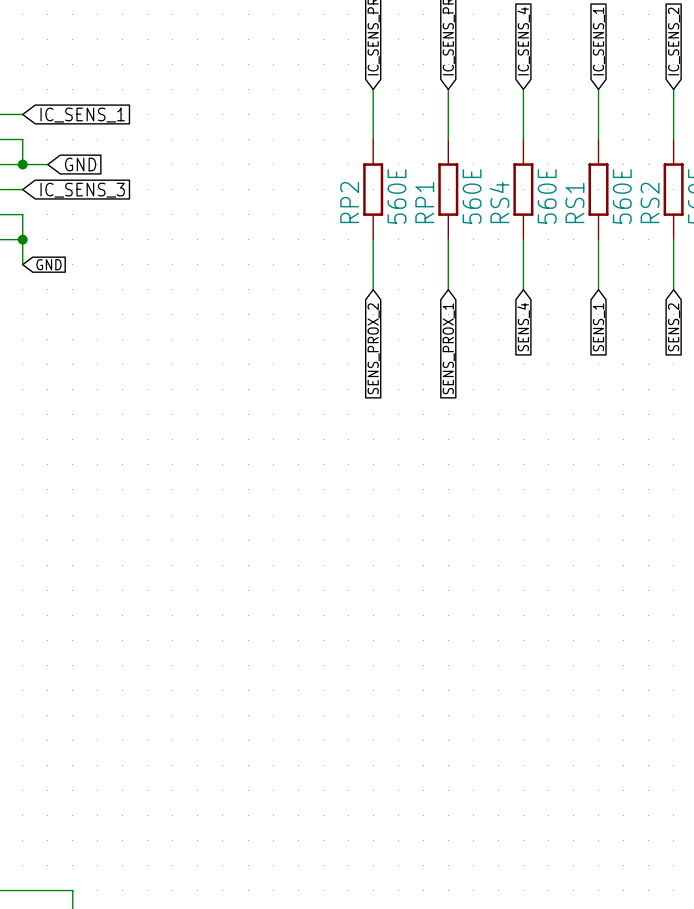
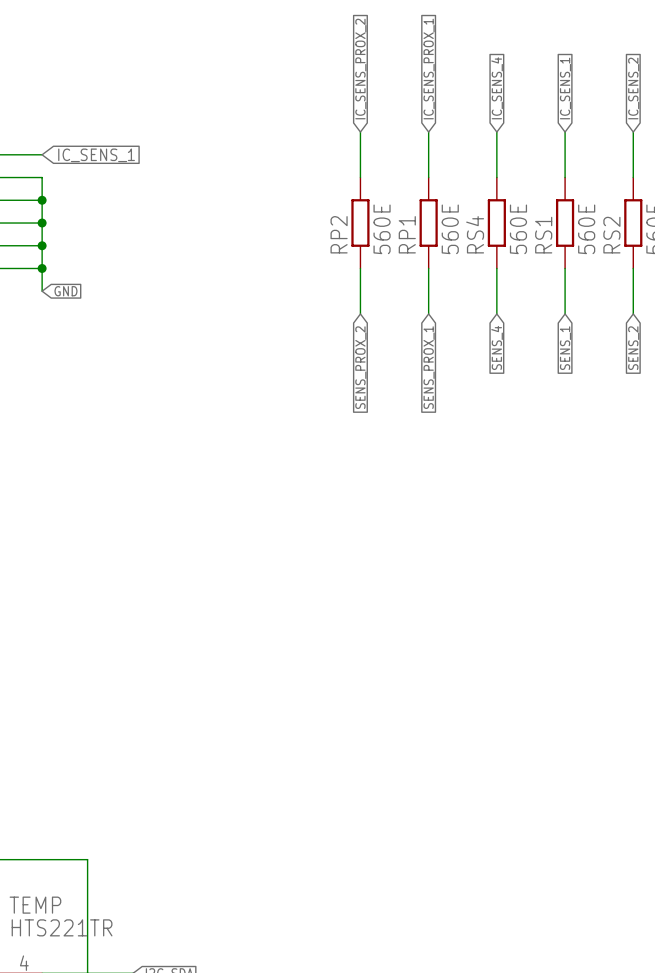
wire: (22, 164) (47, 164) -> (42, 200) (42, 245)
global label: GND (80, 164) -> none
junction: none -> (42, 223)
global label: IC_SENS_3 (82, 190) -> none
junction: none -> (42, 245)

